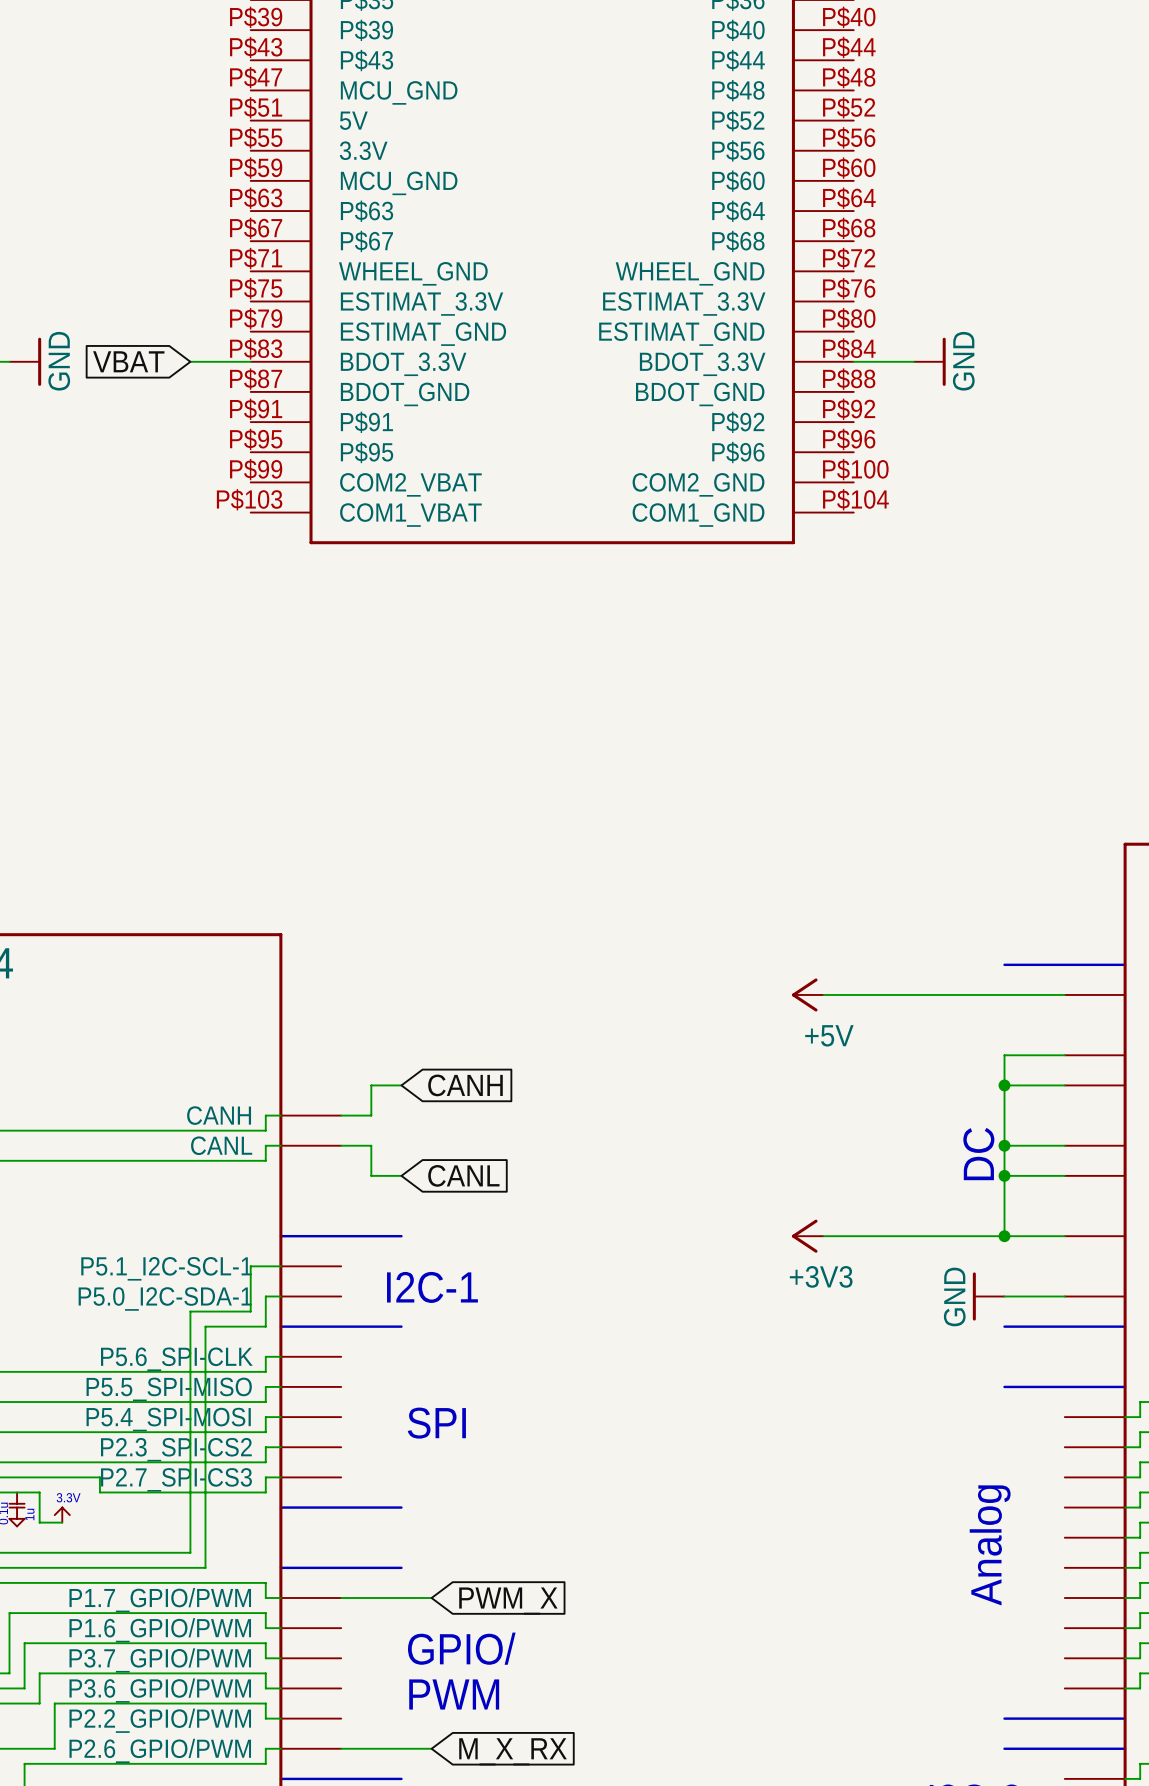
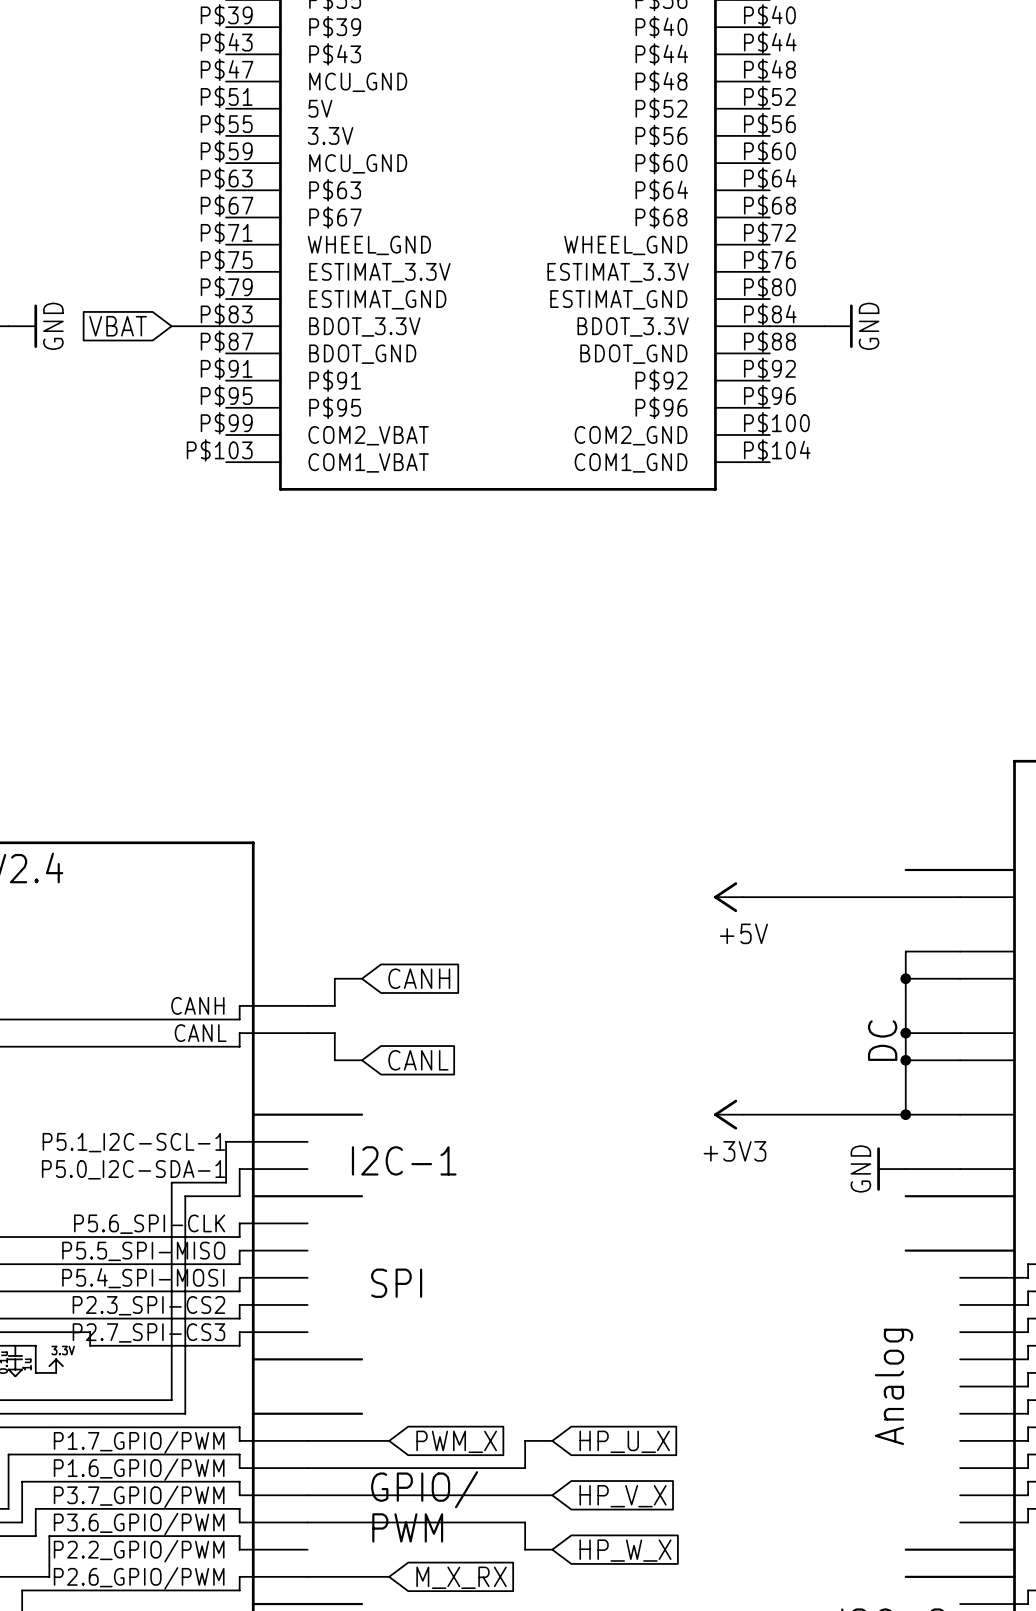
wire: none -> (552, 1440) (525, 1440) (525, 1468) (307, 1468)
global label: none -> HP_U_X (624, 1441)
wire: none -> (307, 1495) (552, 1495)
global label: none -> HP_V_X (623, 1496)
wire: none -> (307, 1522) (525, 1522) (525, 1549) (552, 1549)
global label: none -> HP_W_X (625, 1550)

